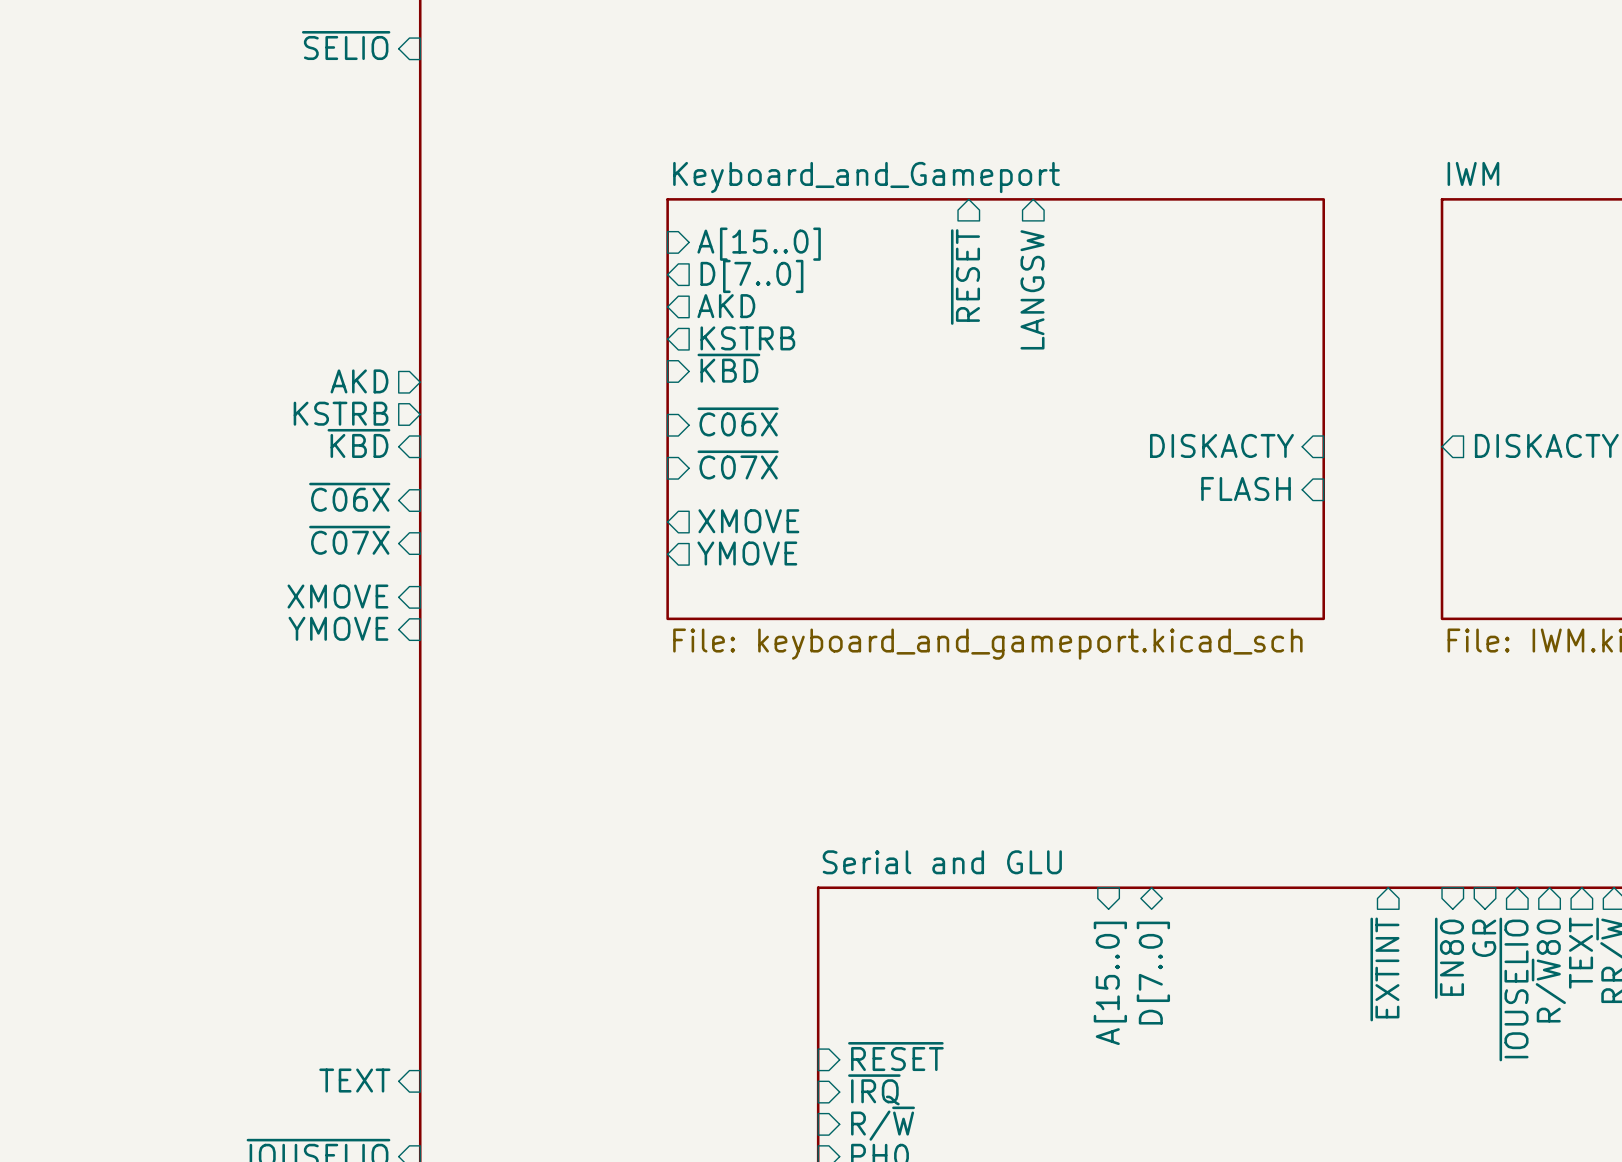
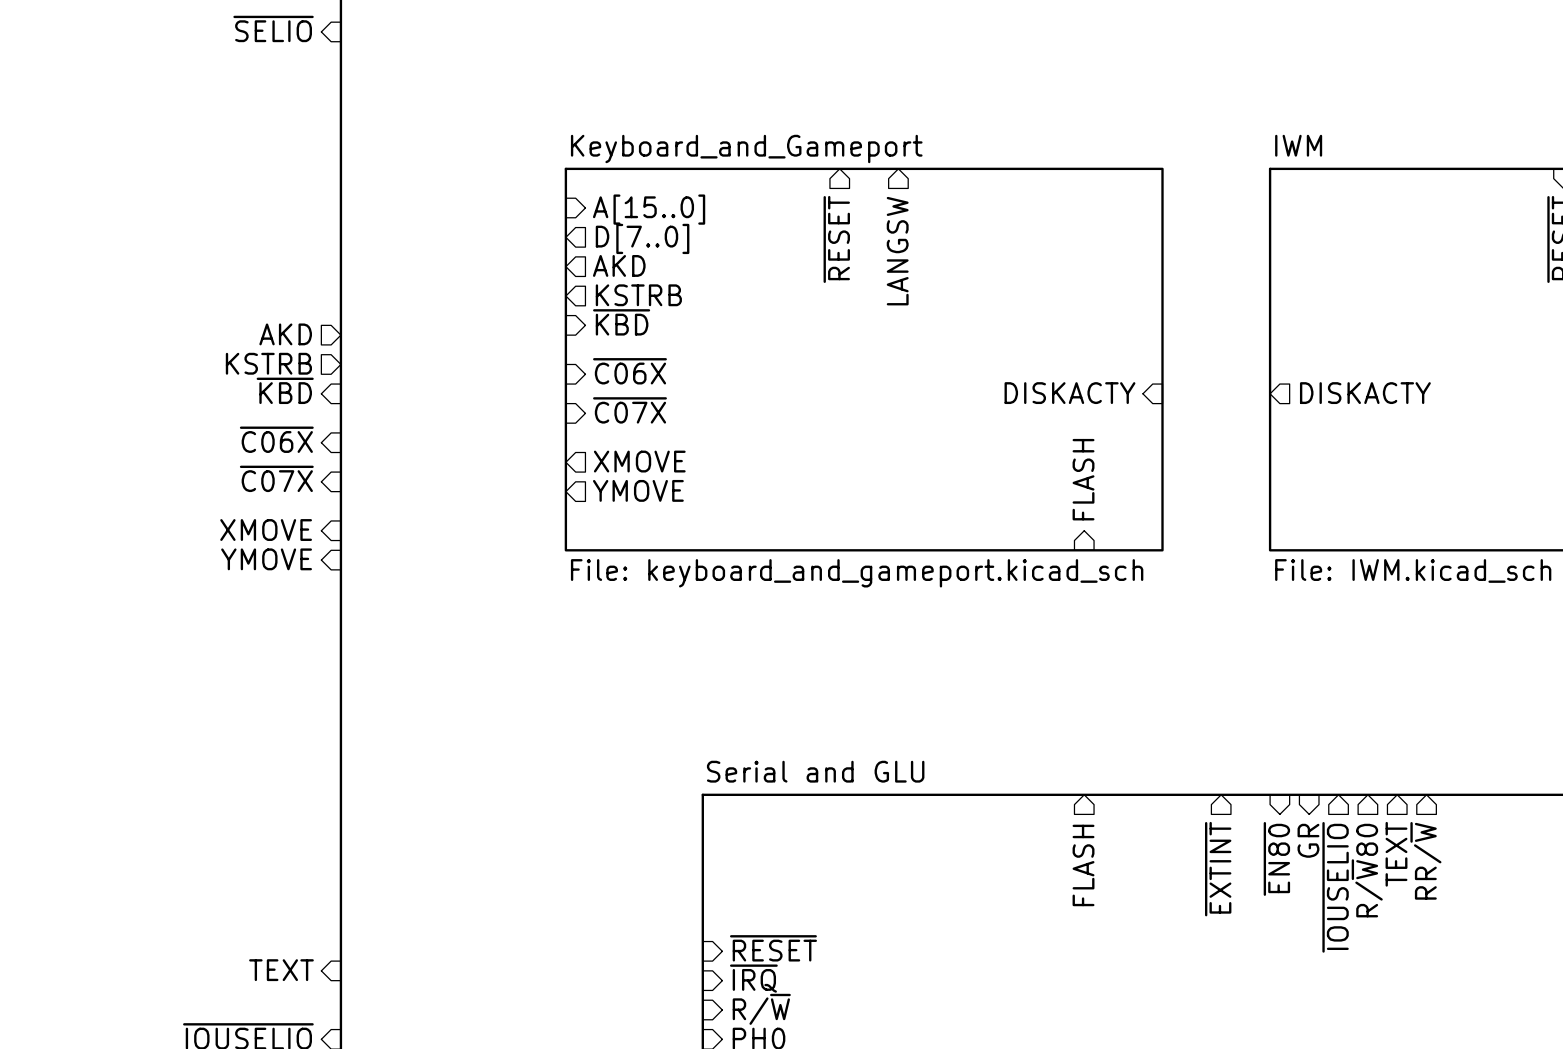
sheet pin rotation: 0° (1246, 488) -> 90° clockwise (1083, 479)
sheet pin: none -> FLASH (1083, 865)
sheet pin: D[7..0] (1153, 973) -> none
sheet pin: A[15..0] (1110, 983) -> none

